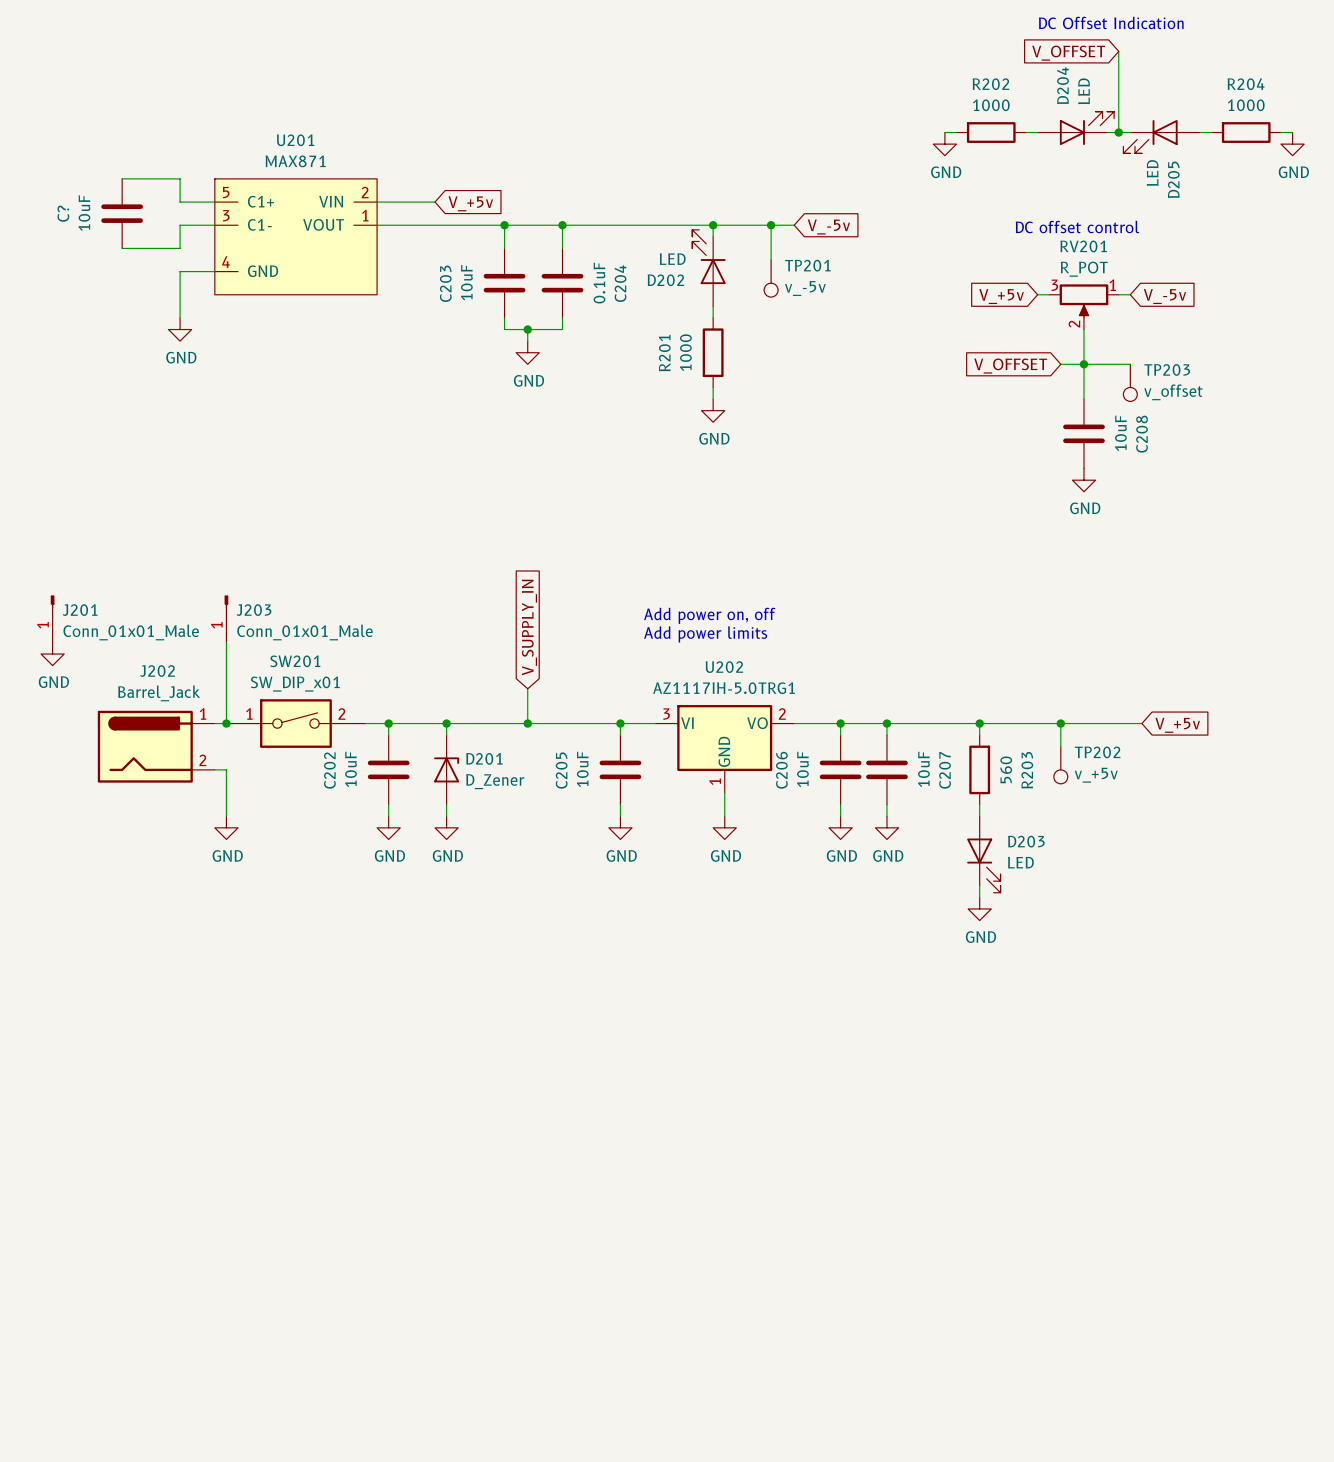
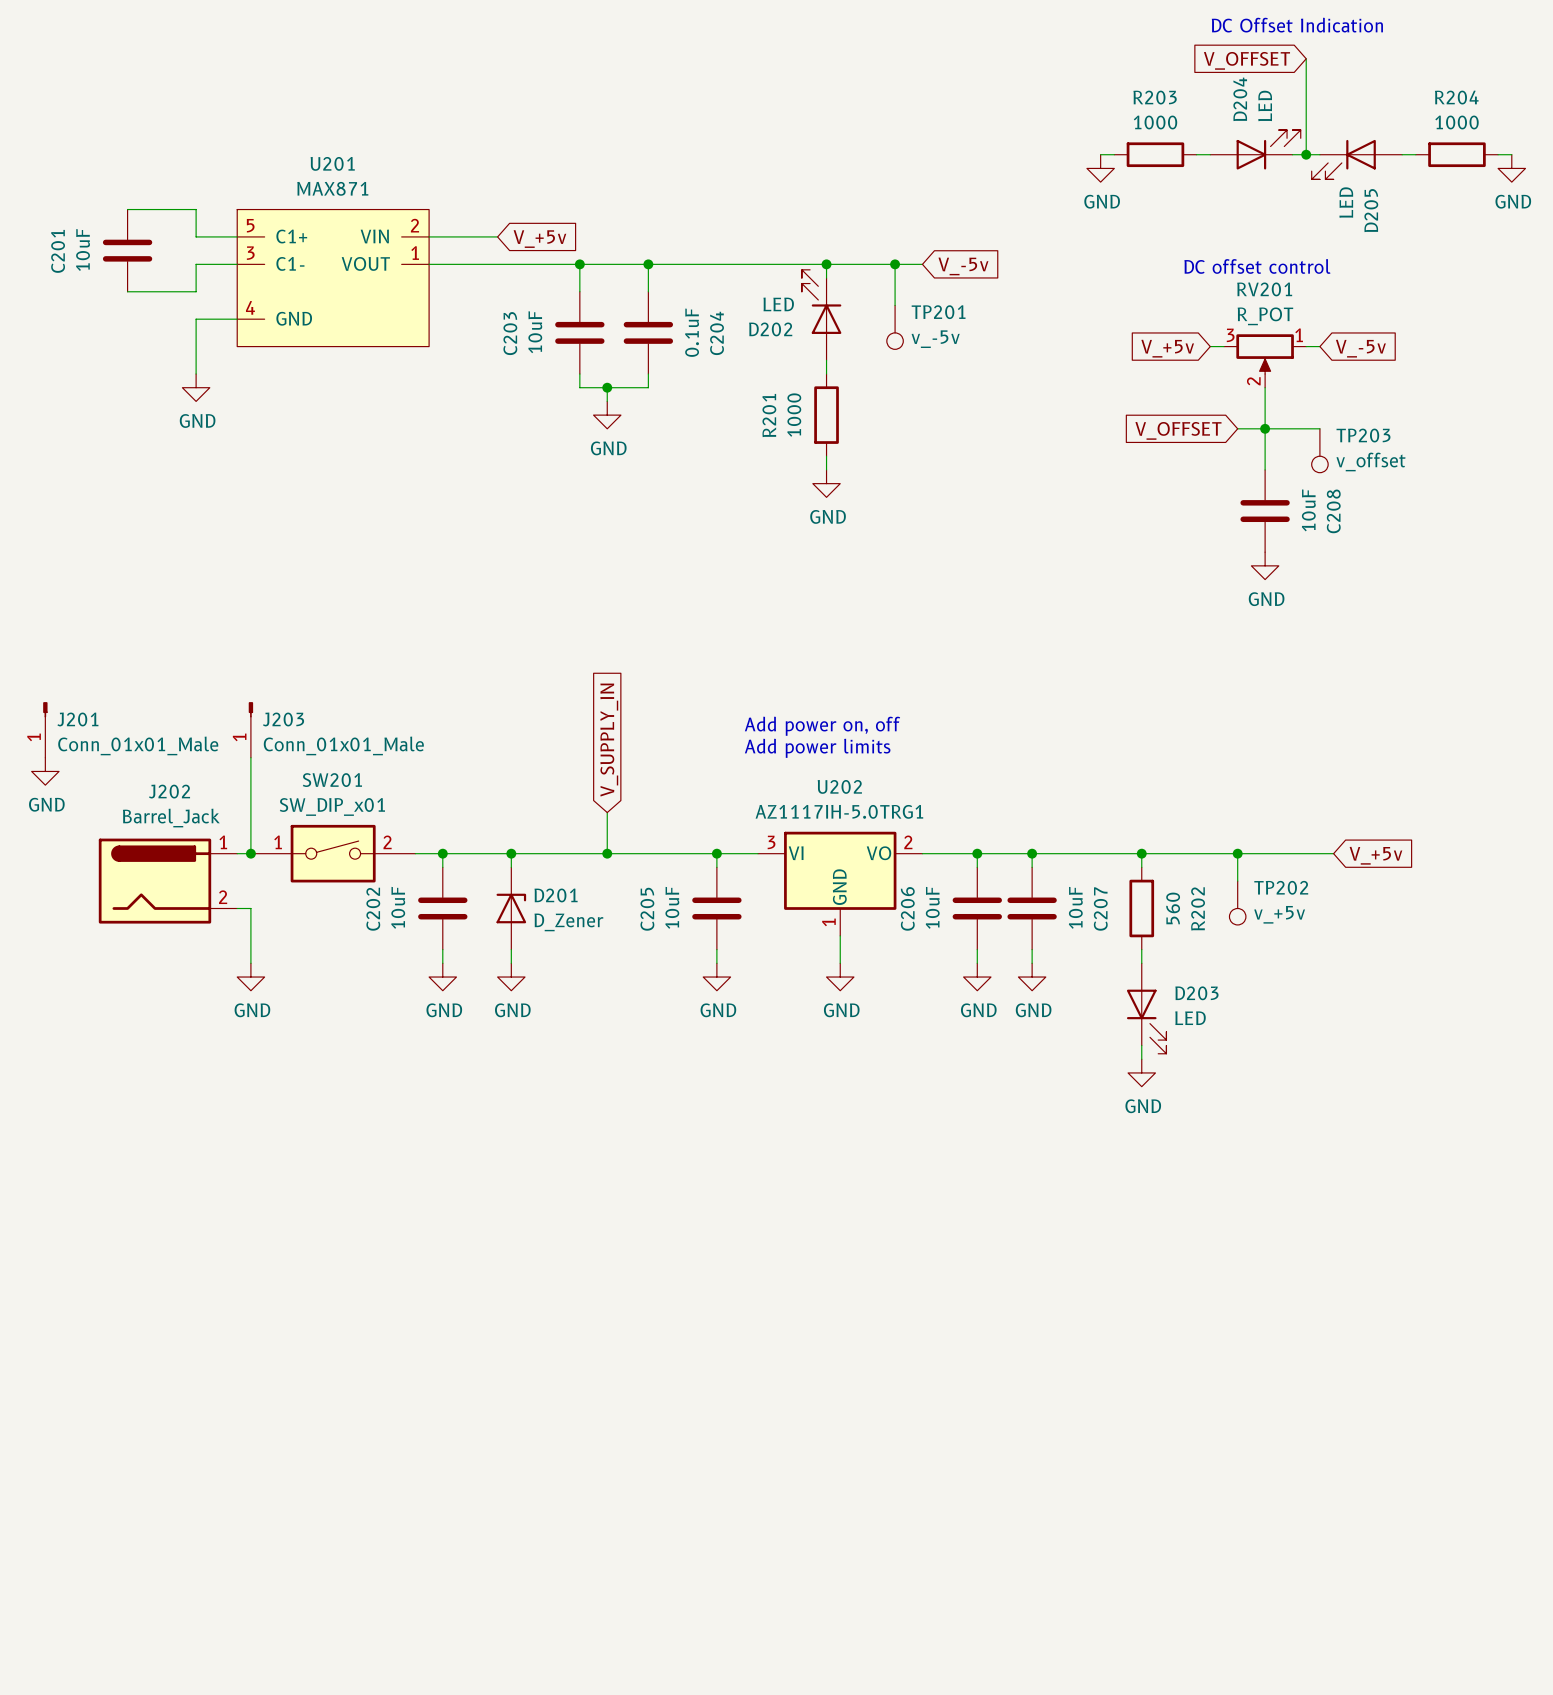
R202 name: R202 (990, 84) -> R203 (1155, 97)
C? name: C? (63, 213) -> C201 (58, 251)
R203 name: R203 (1027, 770) -> R202 (1198, 908)

